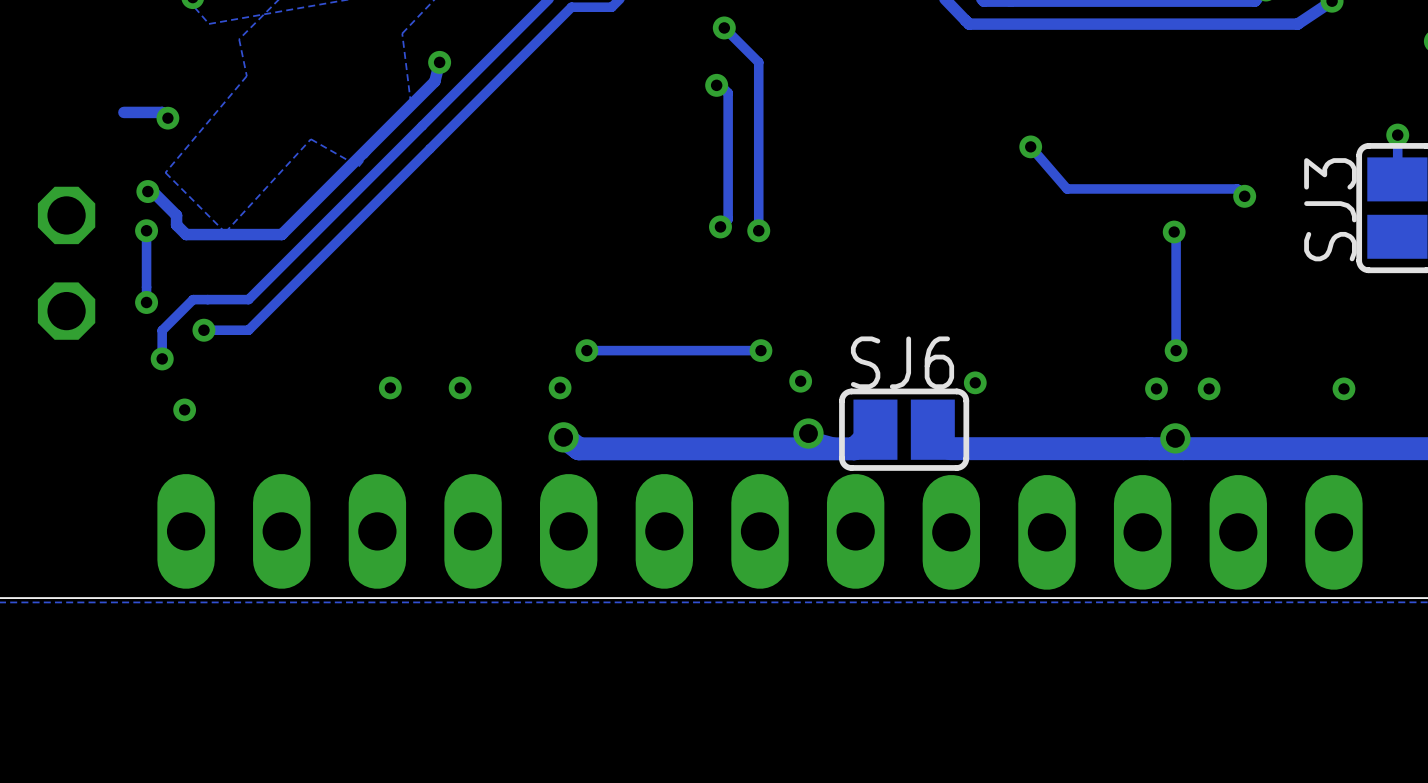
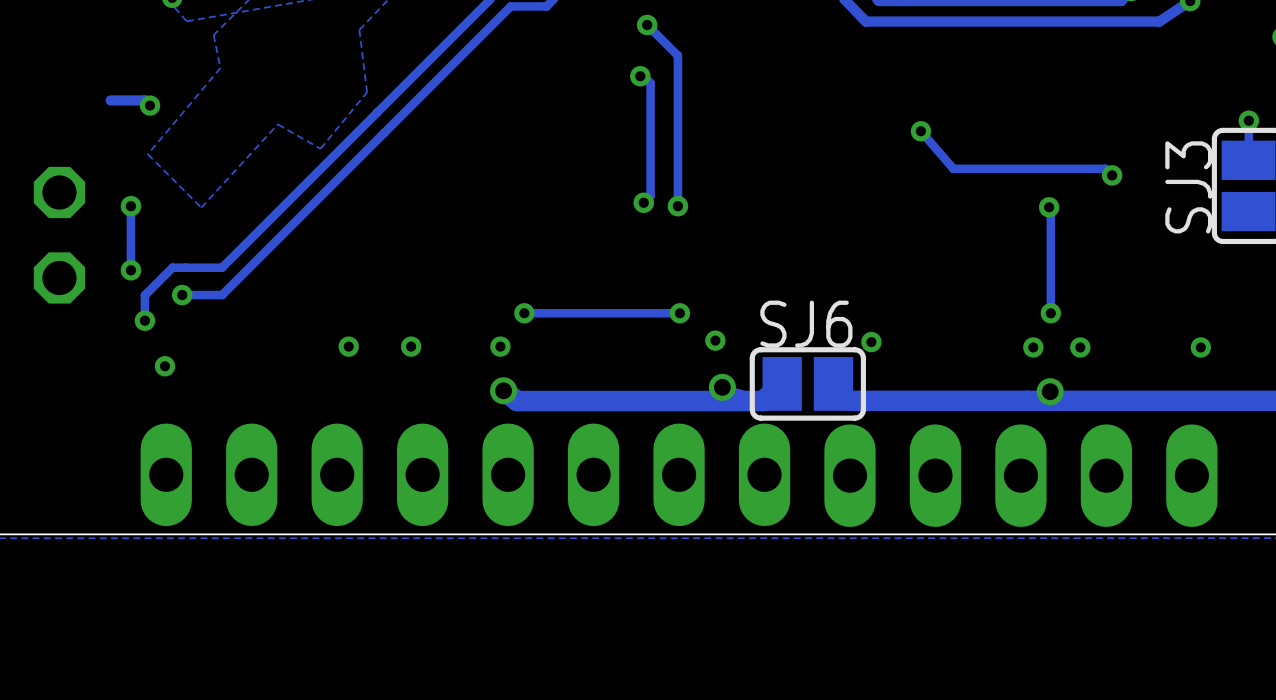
track: (439, 62) (434, 81) (281, 234) (186, 234) (176, 225) (176, 215) (152, 191) (147, 191) -> none
via: (439, 62) -> none
via: (147, 191) -> none

